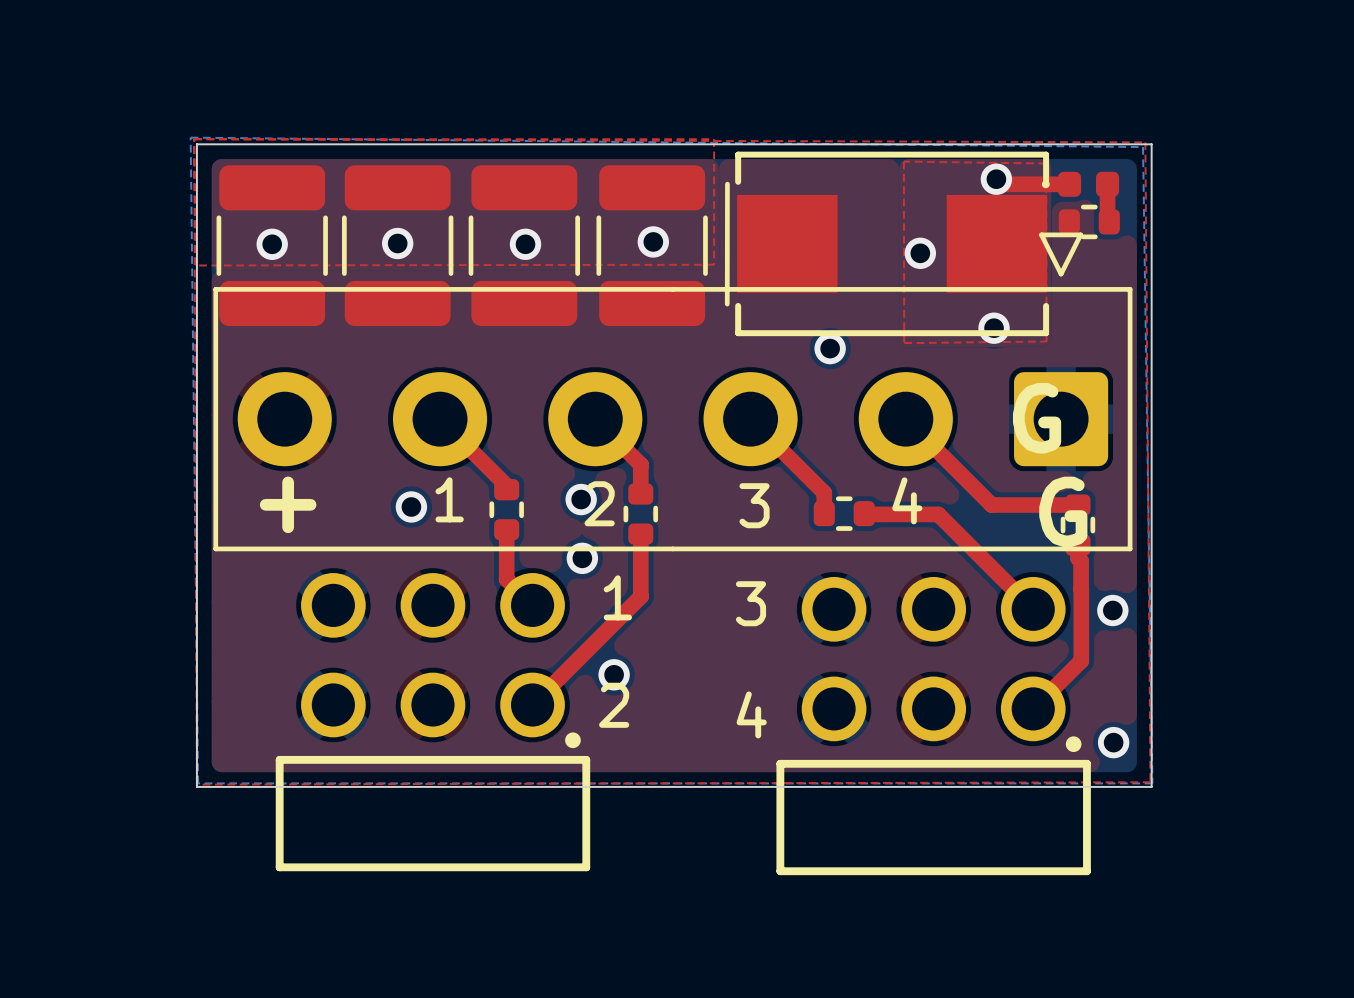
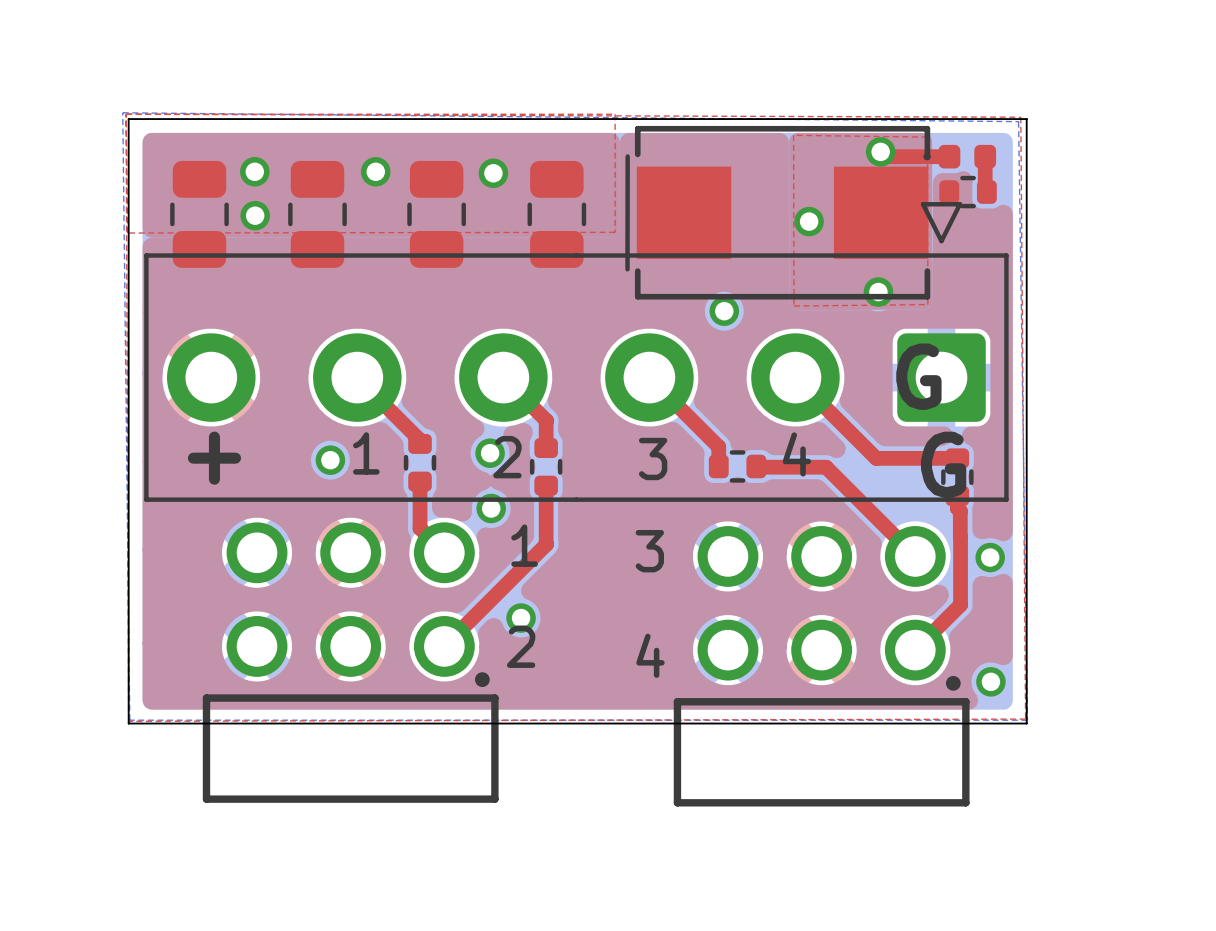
part footprint: [216, 165, 328, 327] -> [170, 160, 229, 268]
part footprint: [342, 165, 454, 327] -> [288, 160, 347, 268]
part footprint: [468, 165, 581, 327] -> [407, 160, 466, 268]
part footprint: [596, 165, 708, 327] -> [527, 160, 587, 268]
via: none -> (254, 171)
via: none -> (375, 171)
via: none -> (493, 173)
via: (653, 241) -> none
via: (397, 243) -> none
via: (272, 244) -> none
via: (525, 244) -> none
via: none -> (255, 215)

